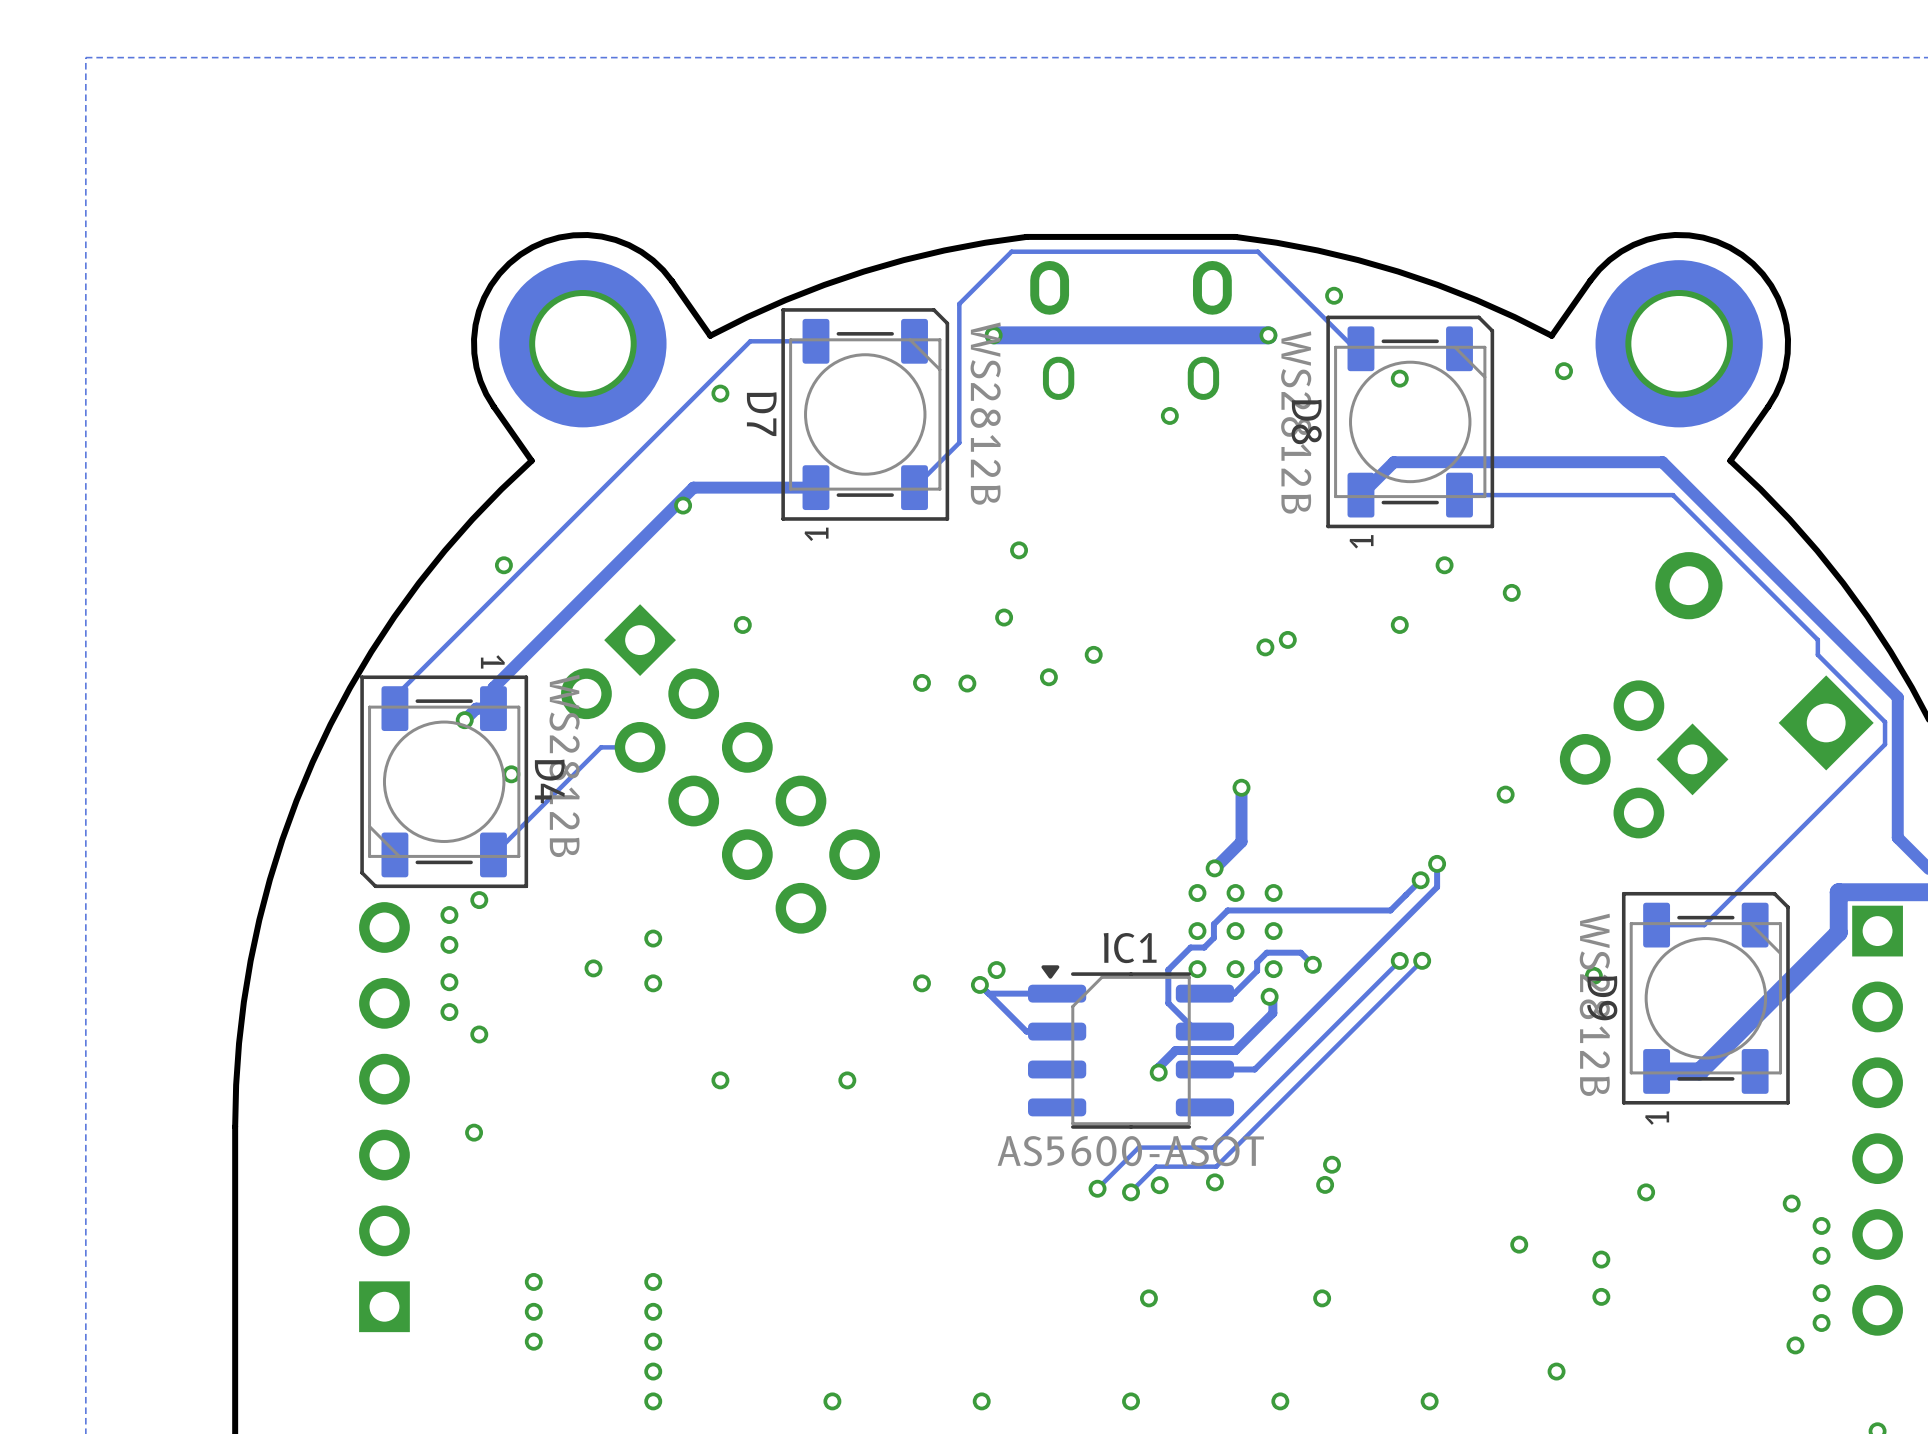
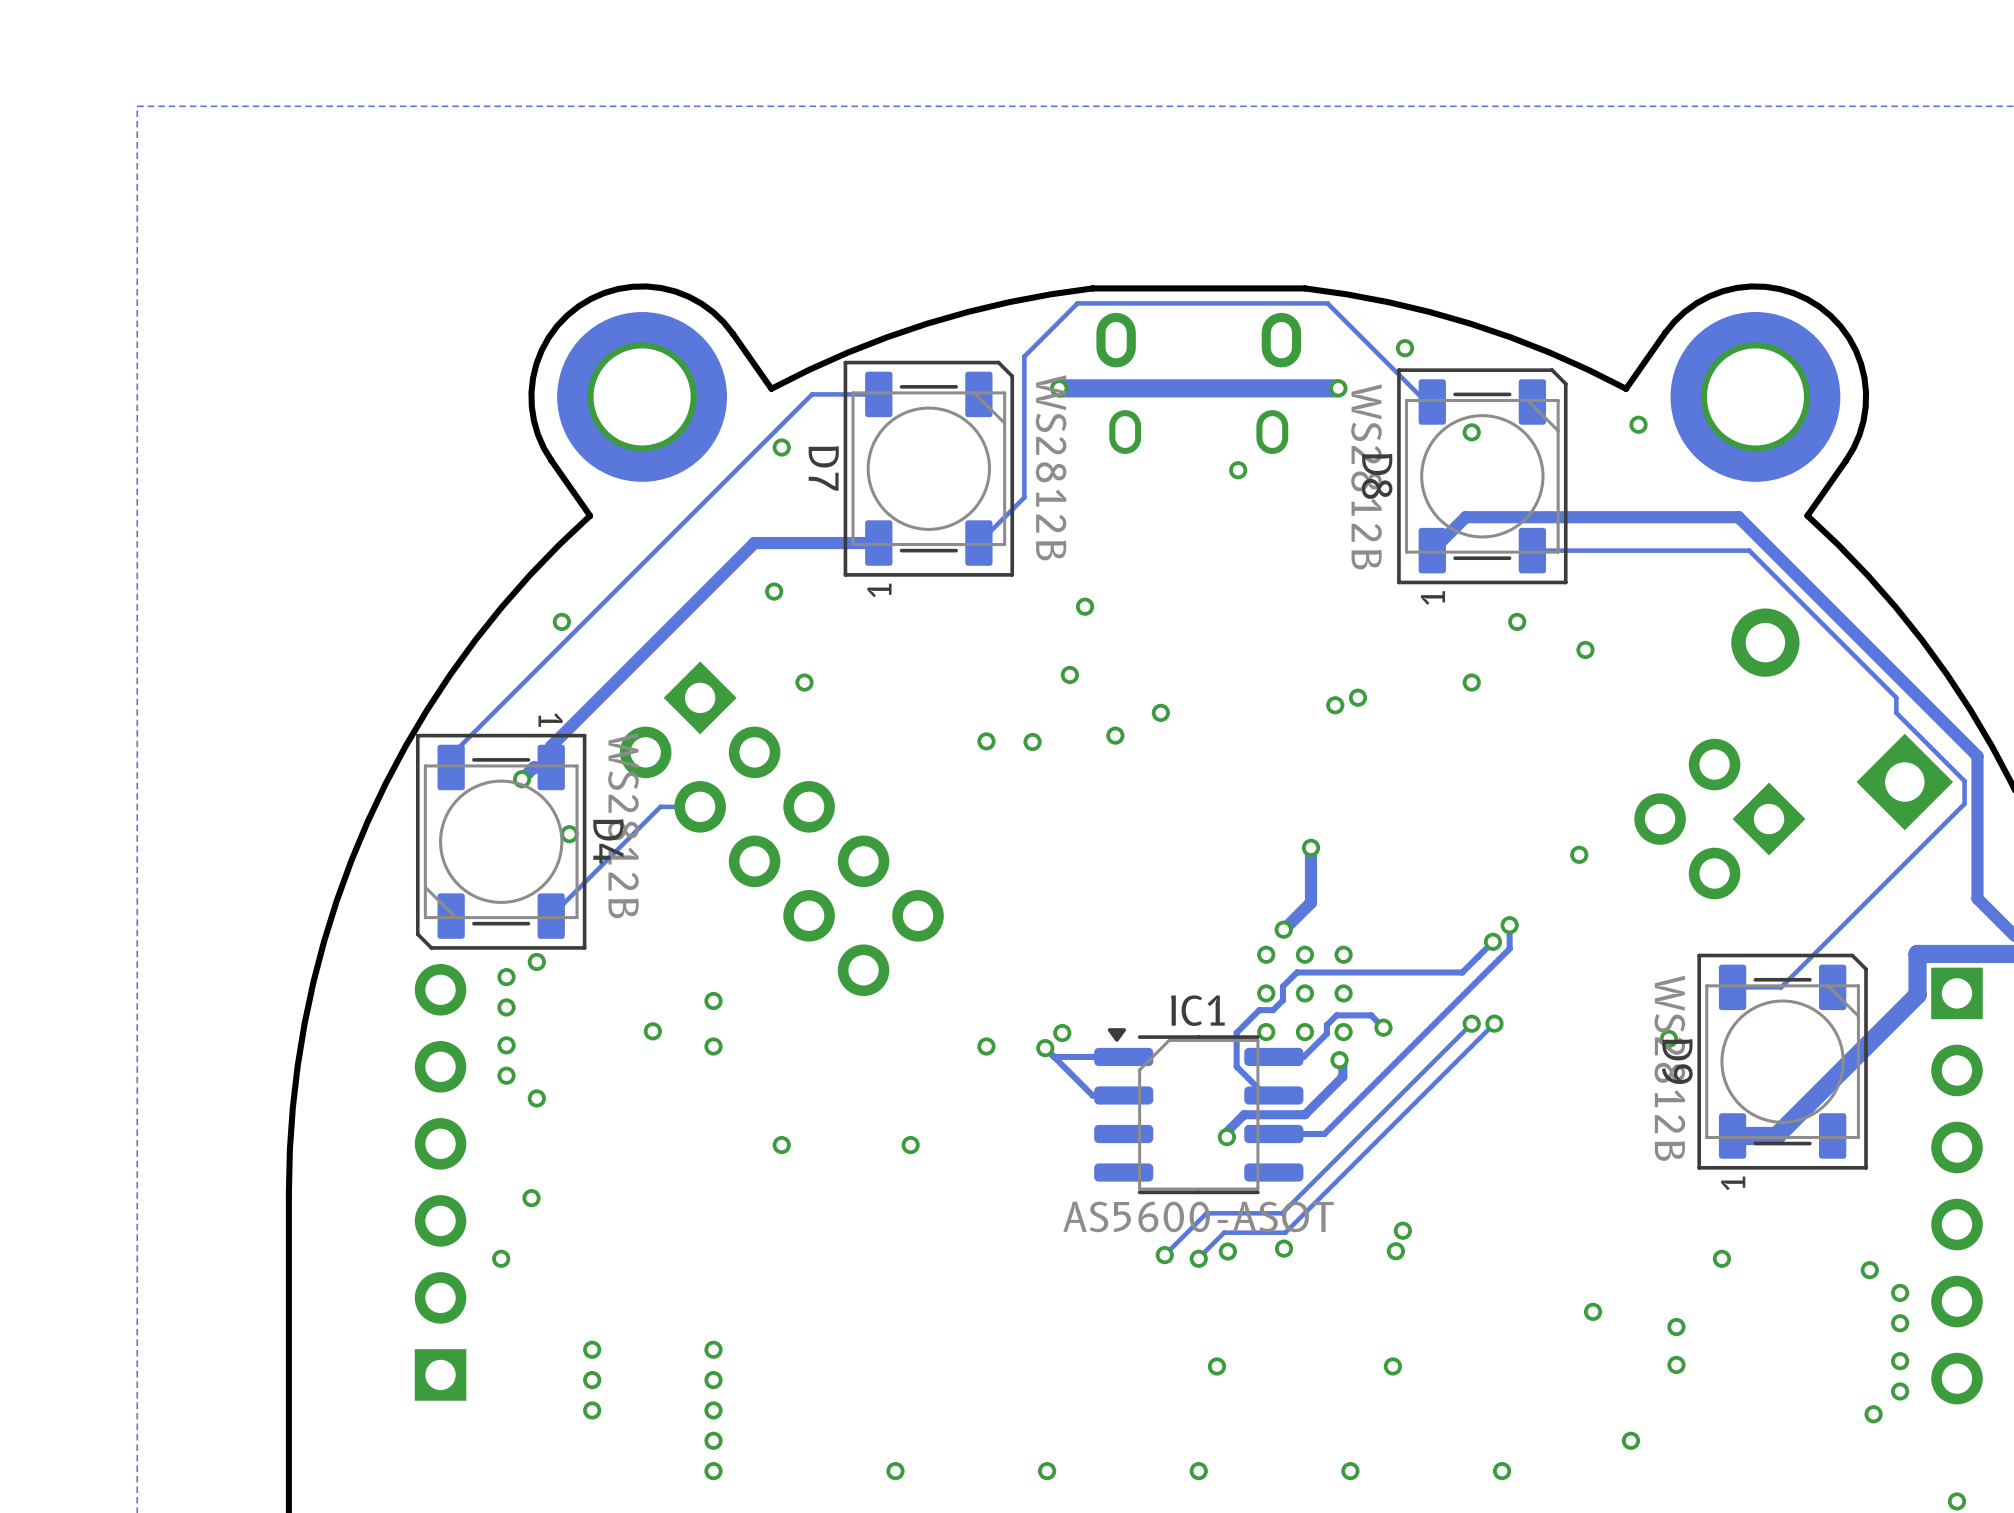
via position: (683, 505) -> (774, 591)
via: none -> (501, 1258)

